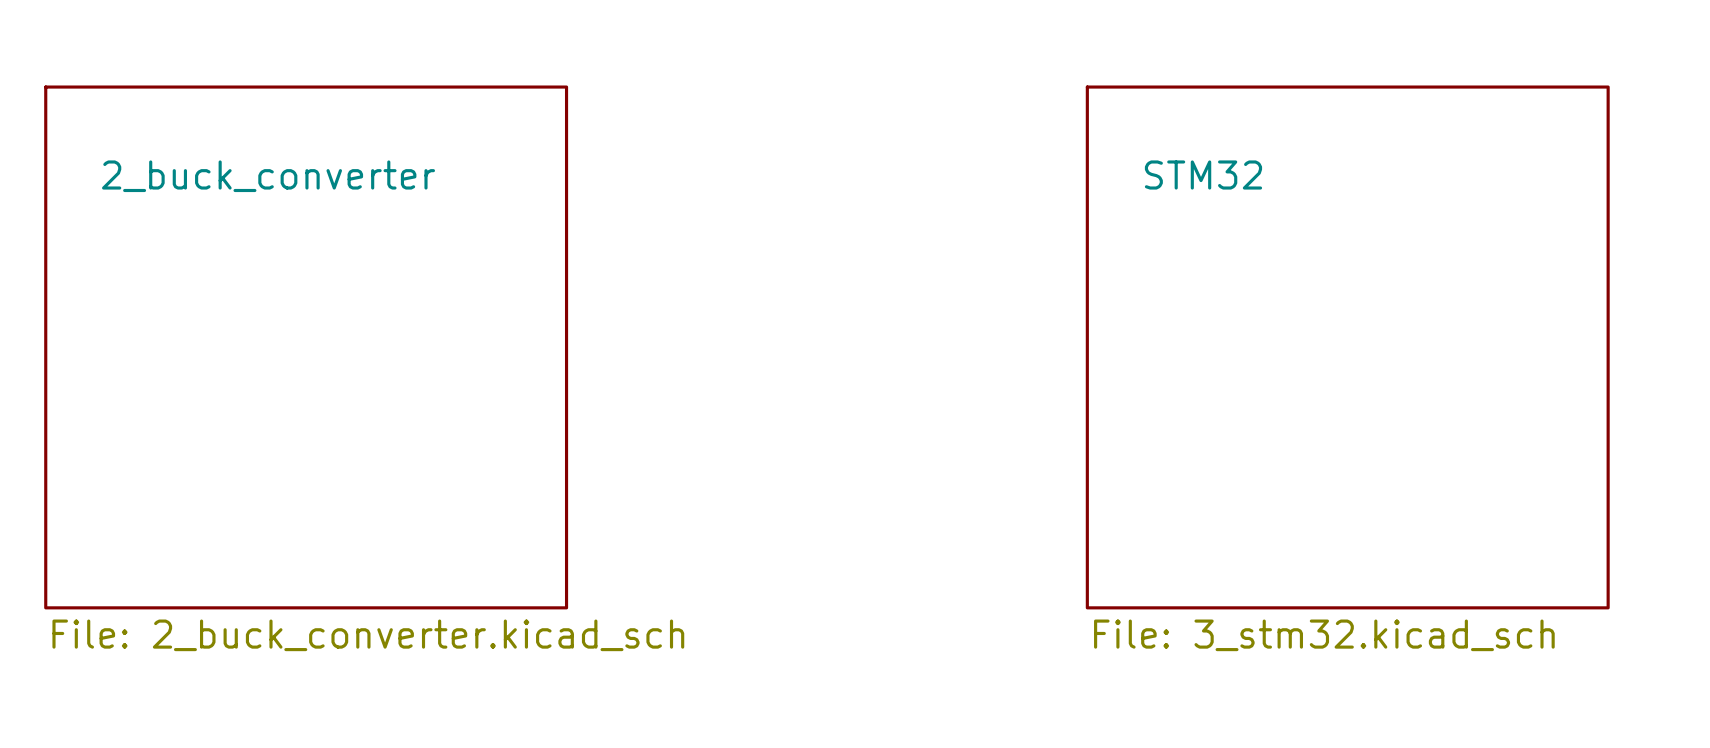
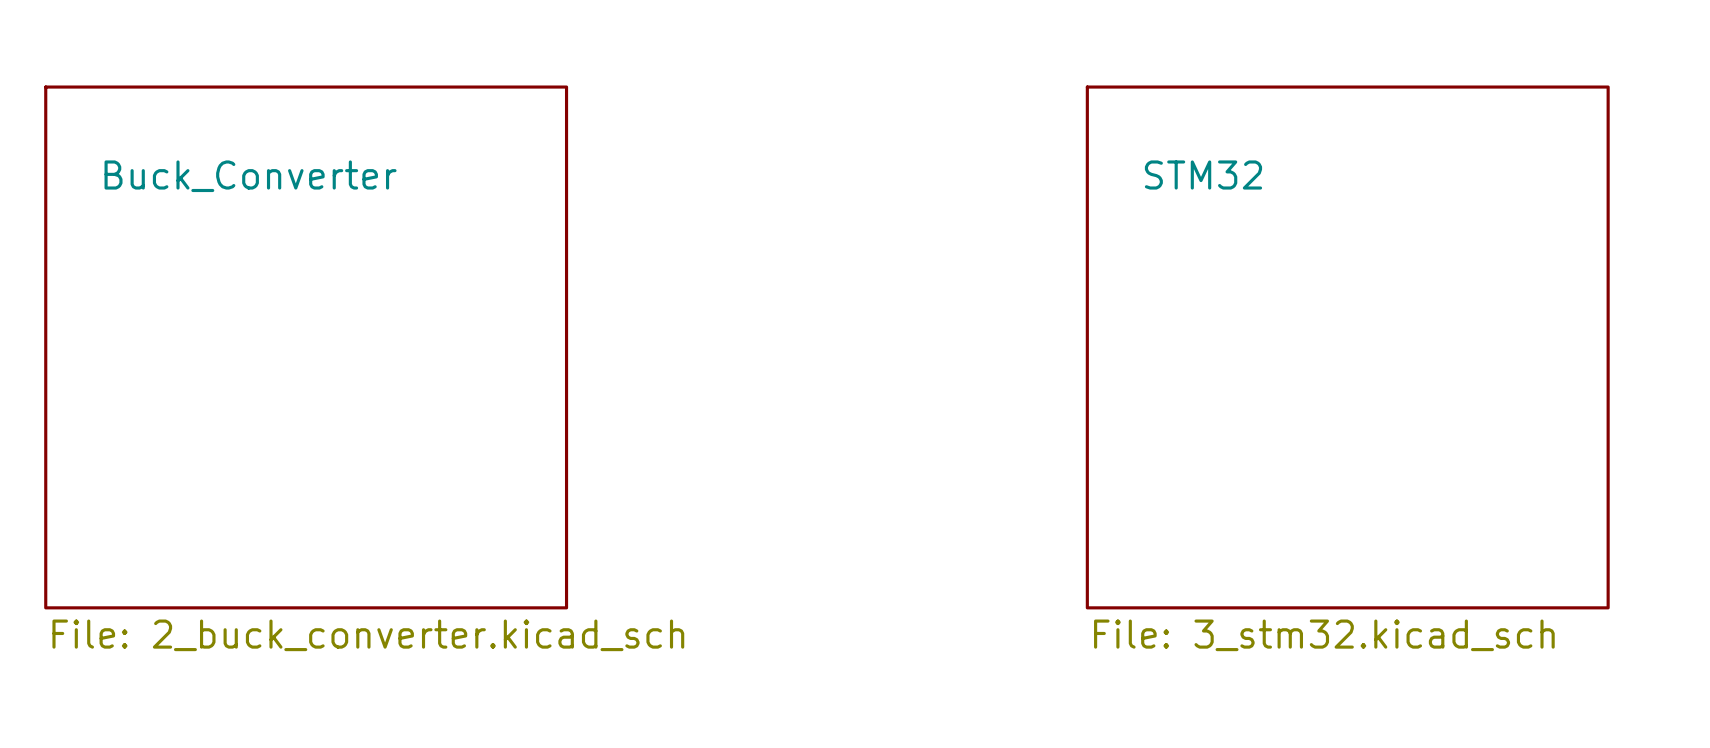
sheet 2_buck_converter name: 2_buck_converter (268, 176) -> Buck_Converter (250, 176)

